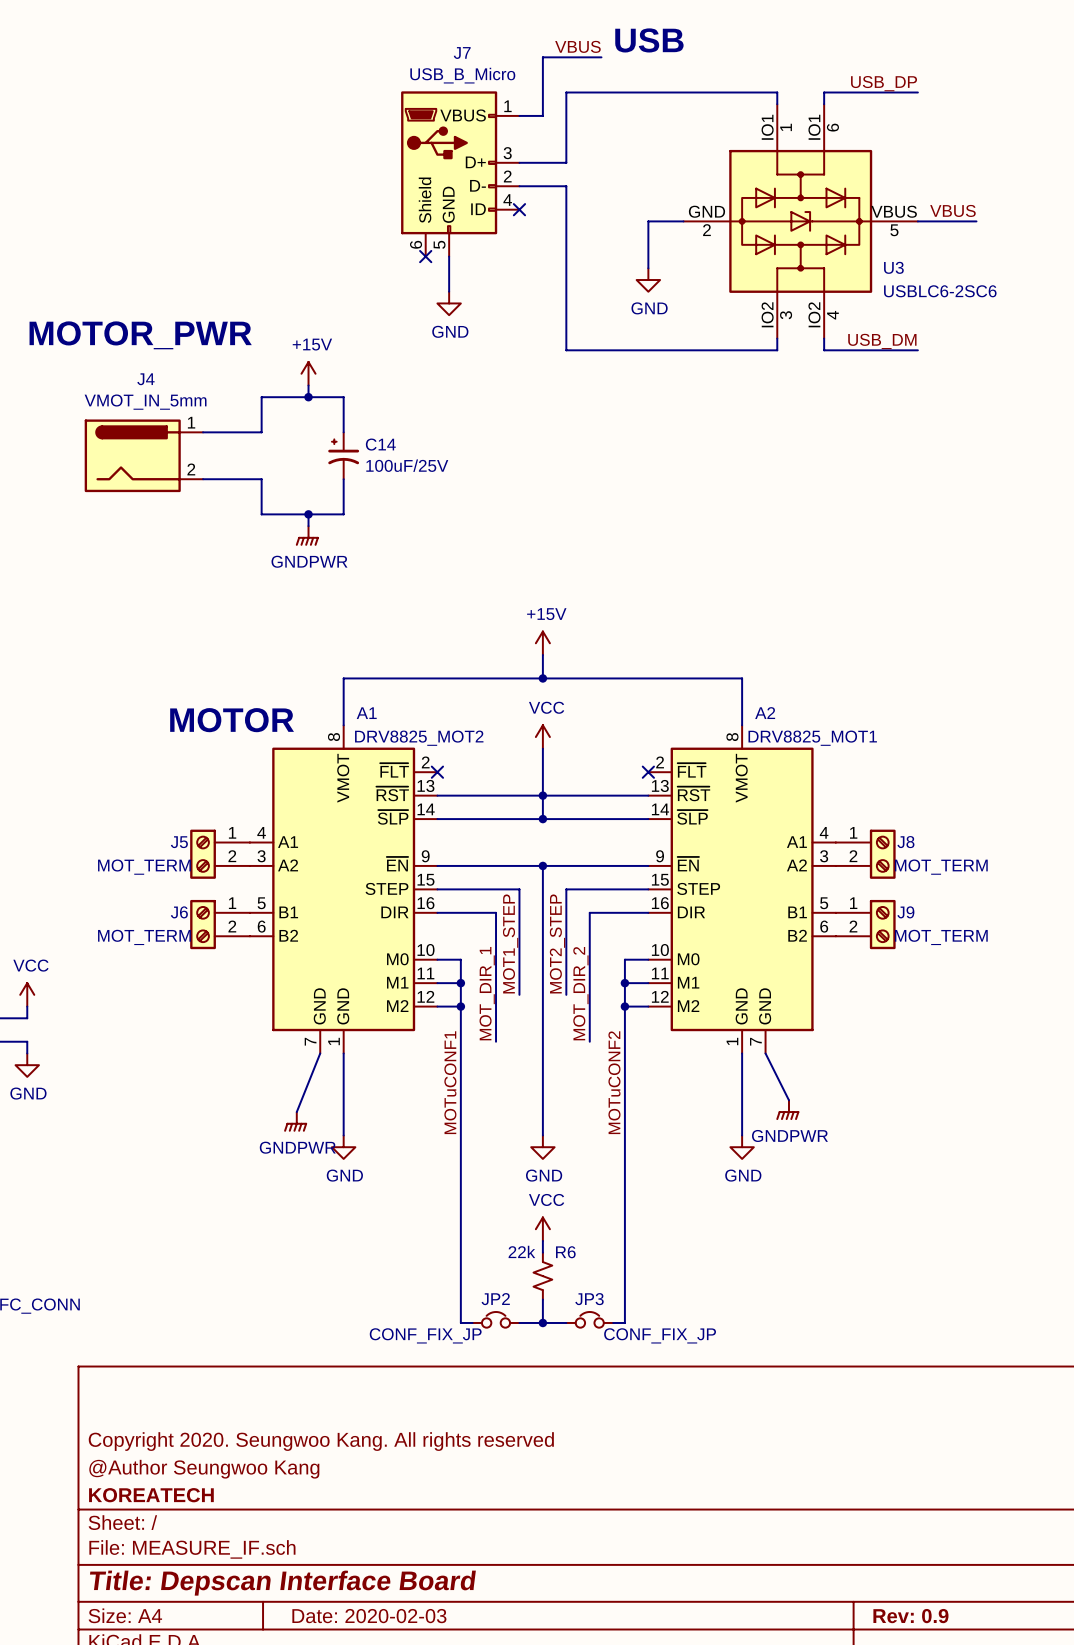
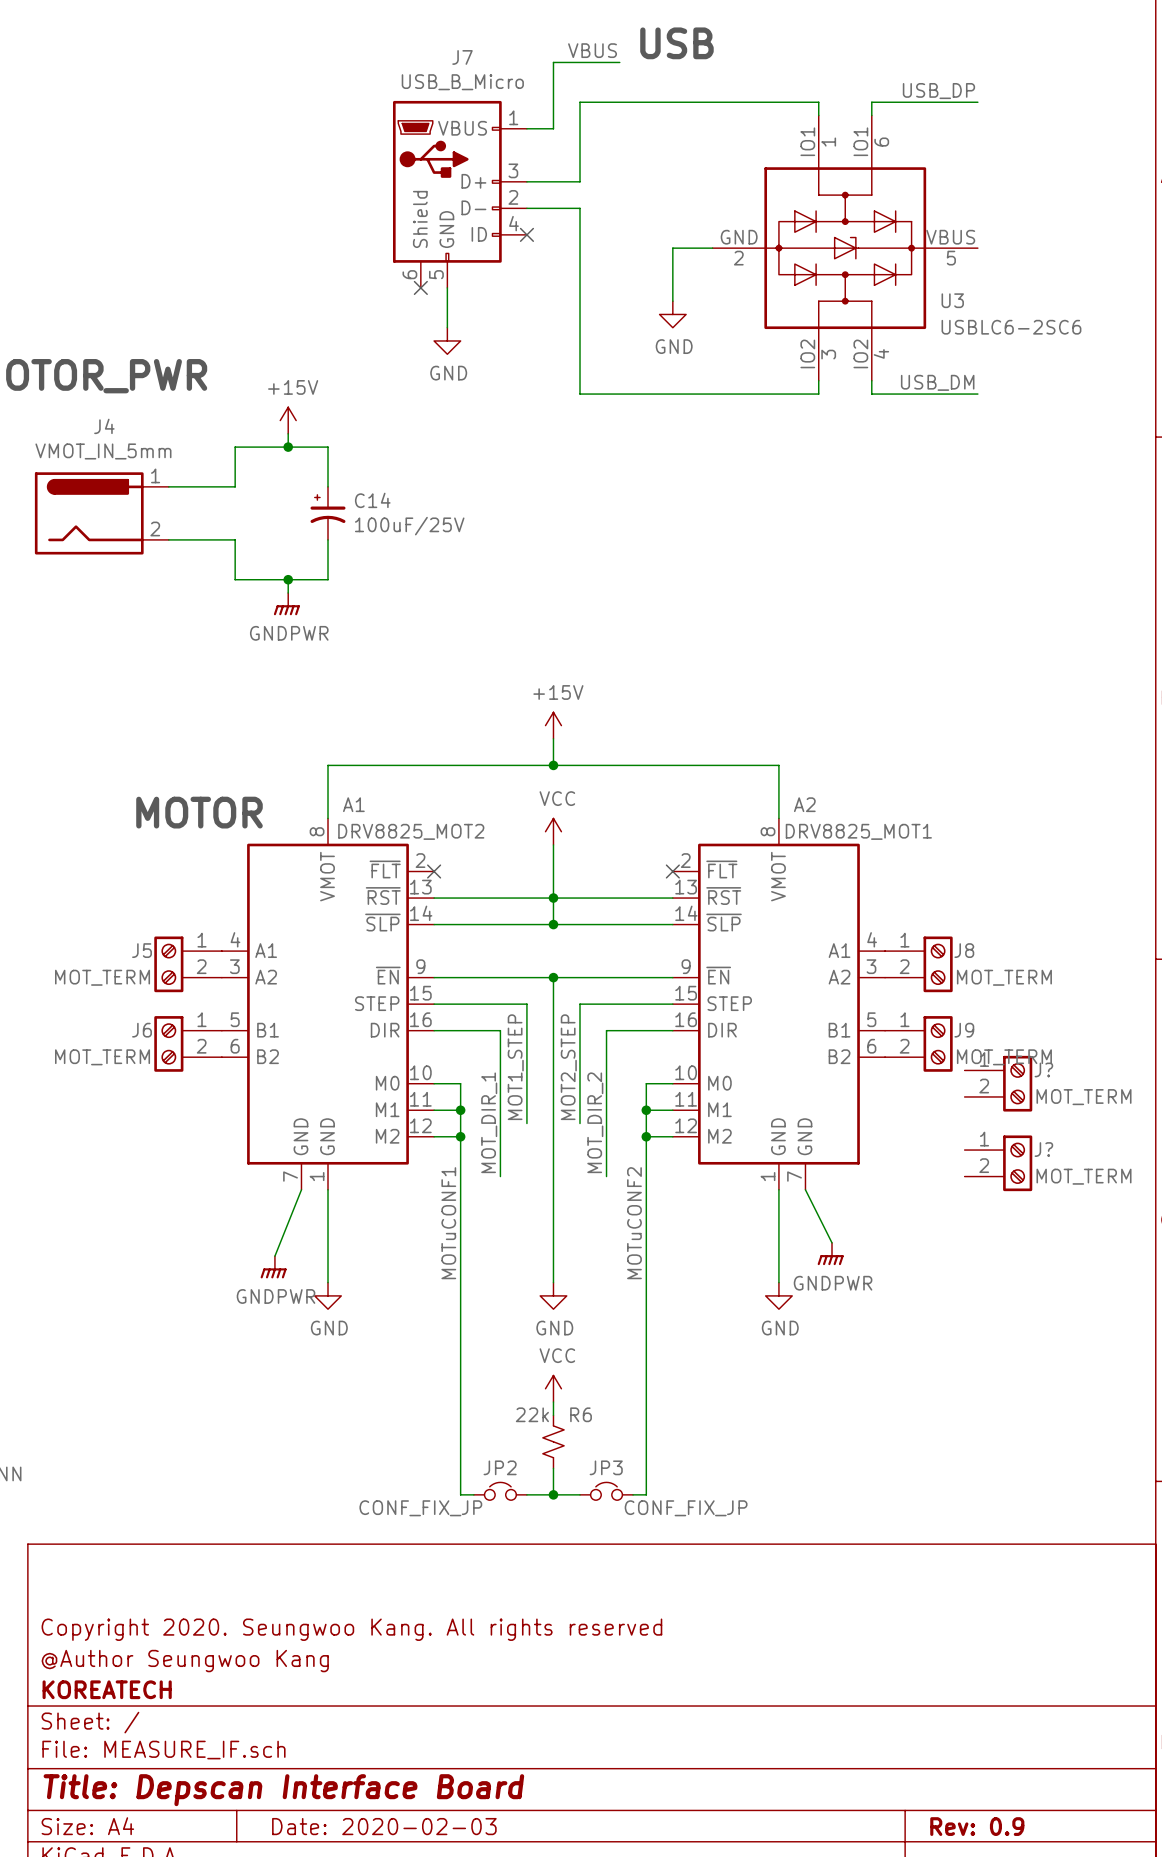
label: VBUS (952, 210) -> none
wire: (917, 221) (976, 221) -> none
J?: none -> MOT_TERM (998, 1083)
J?: none -> MOT_TERM (998, 1163)

